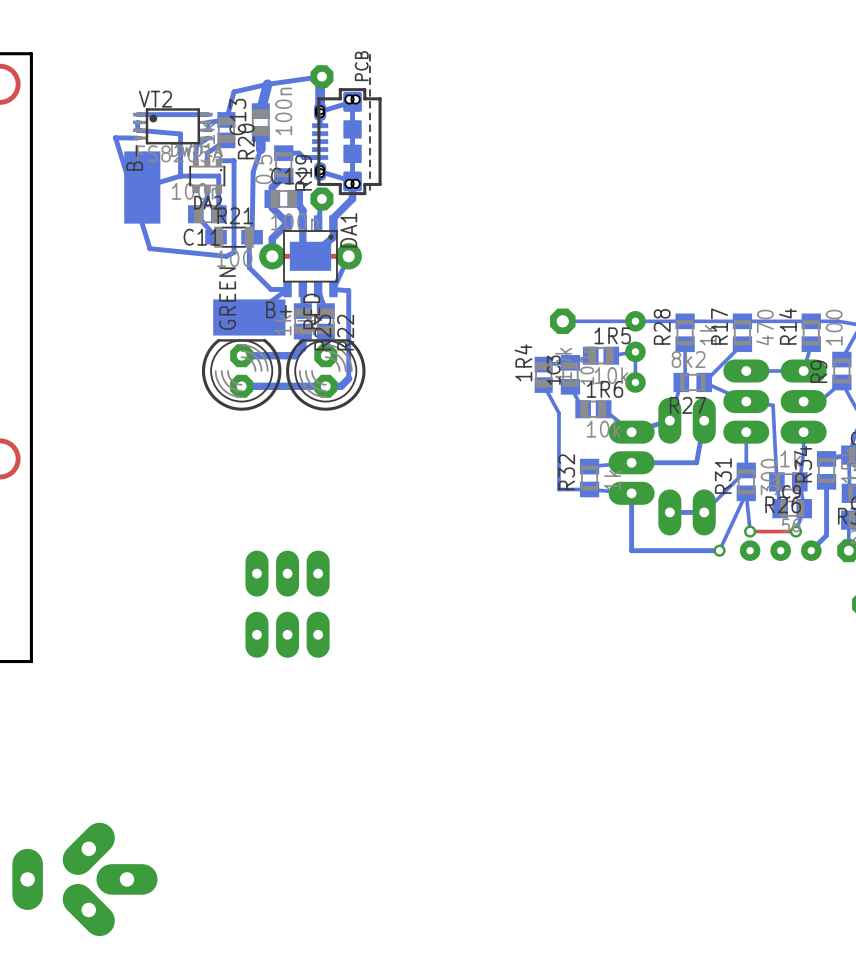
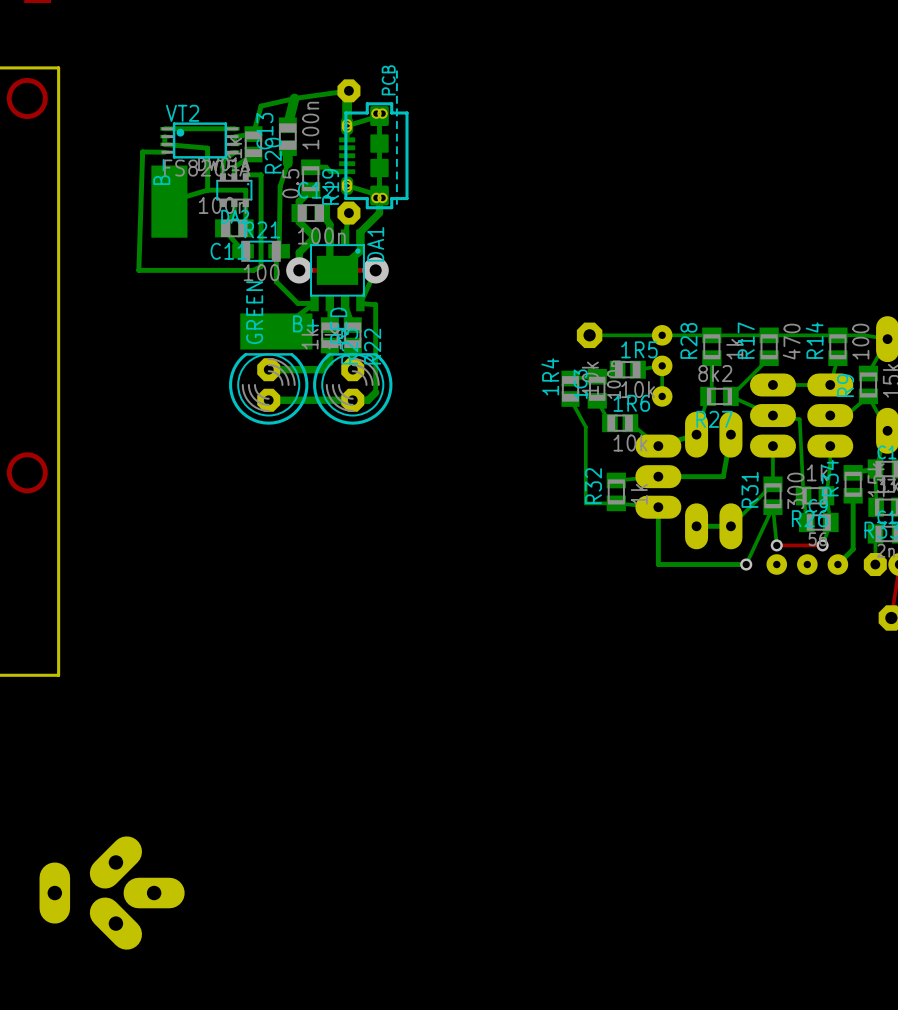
bottom track: (115, 137) (149, 248) (226, 256) -> (142, 151) (138, 270) (253, 270)
part: (287, 604) -> none

